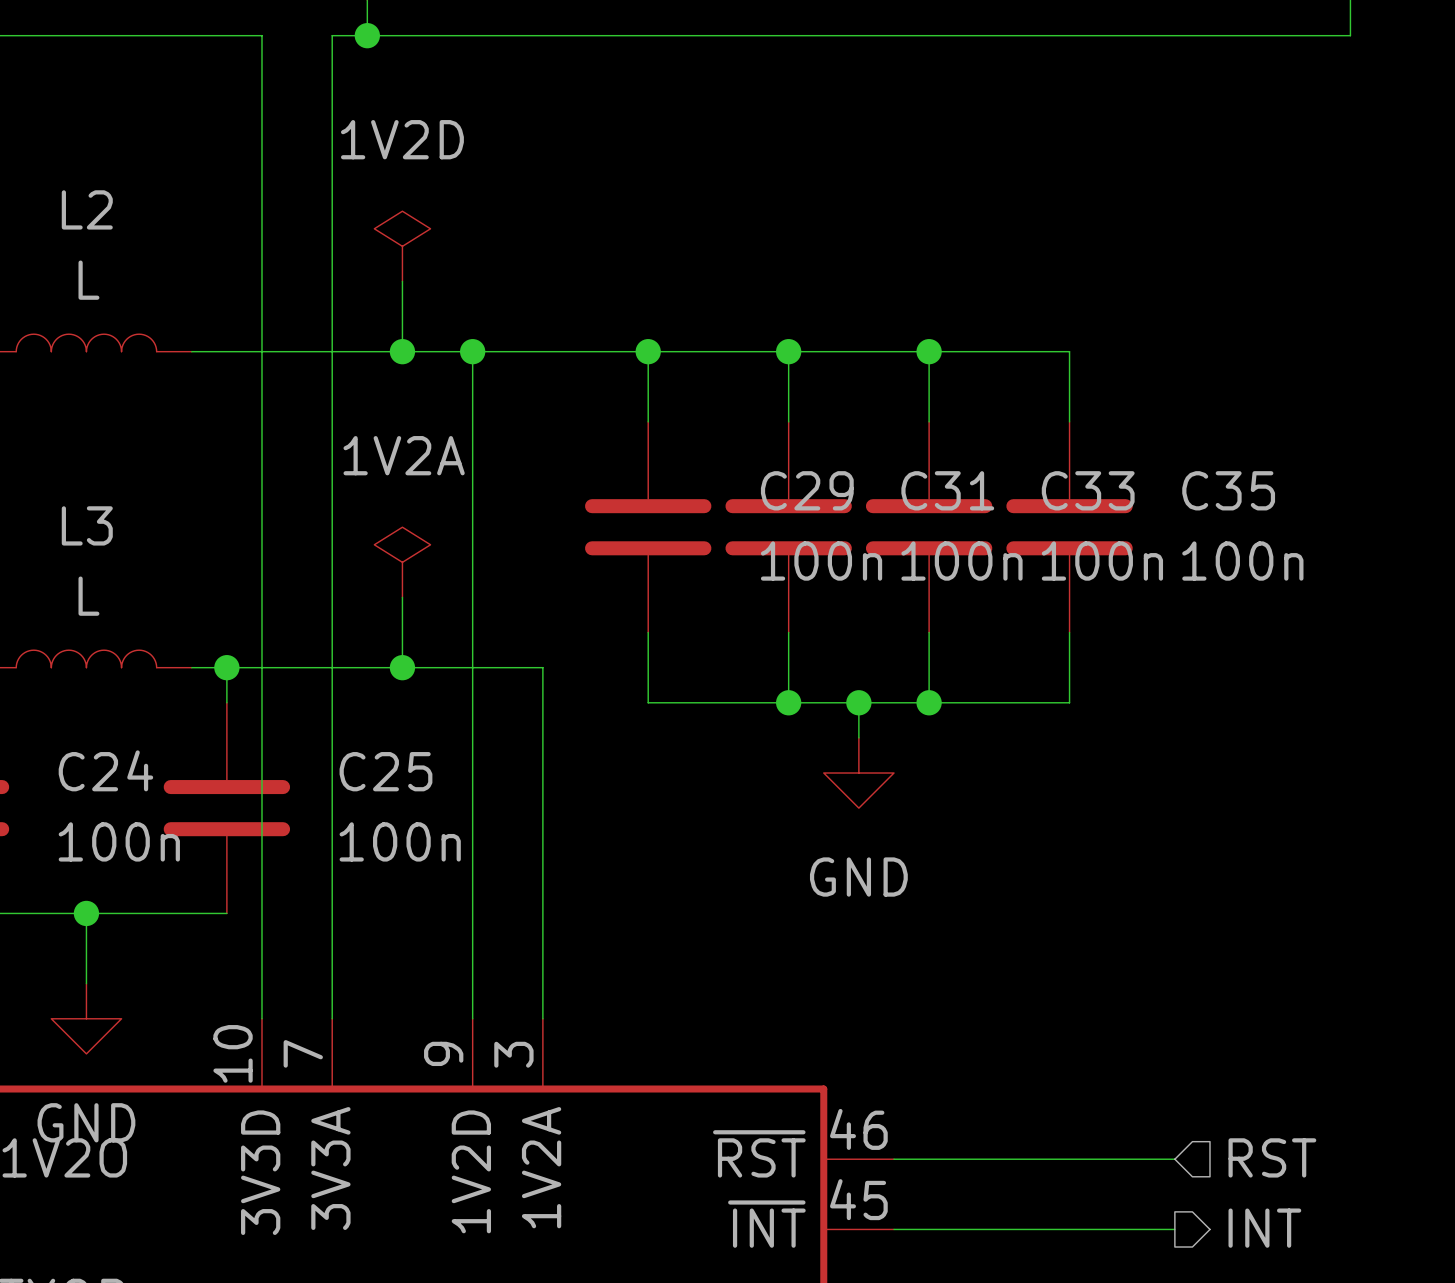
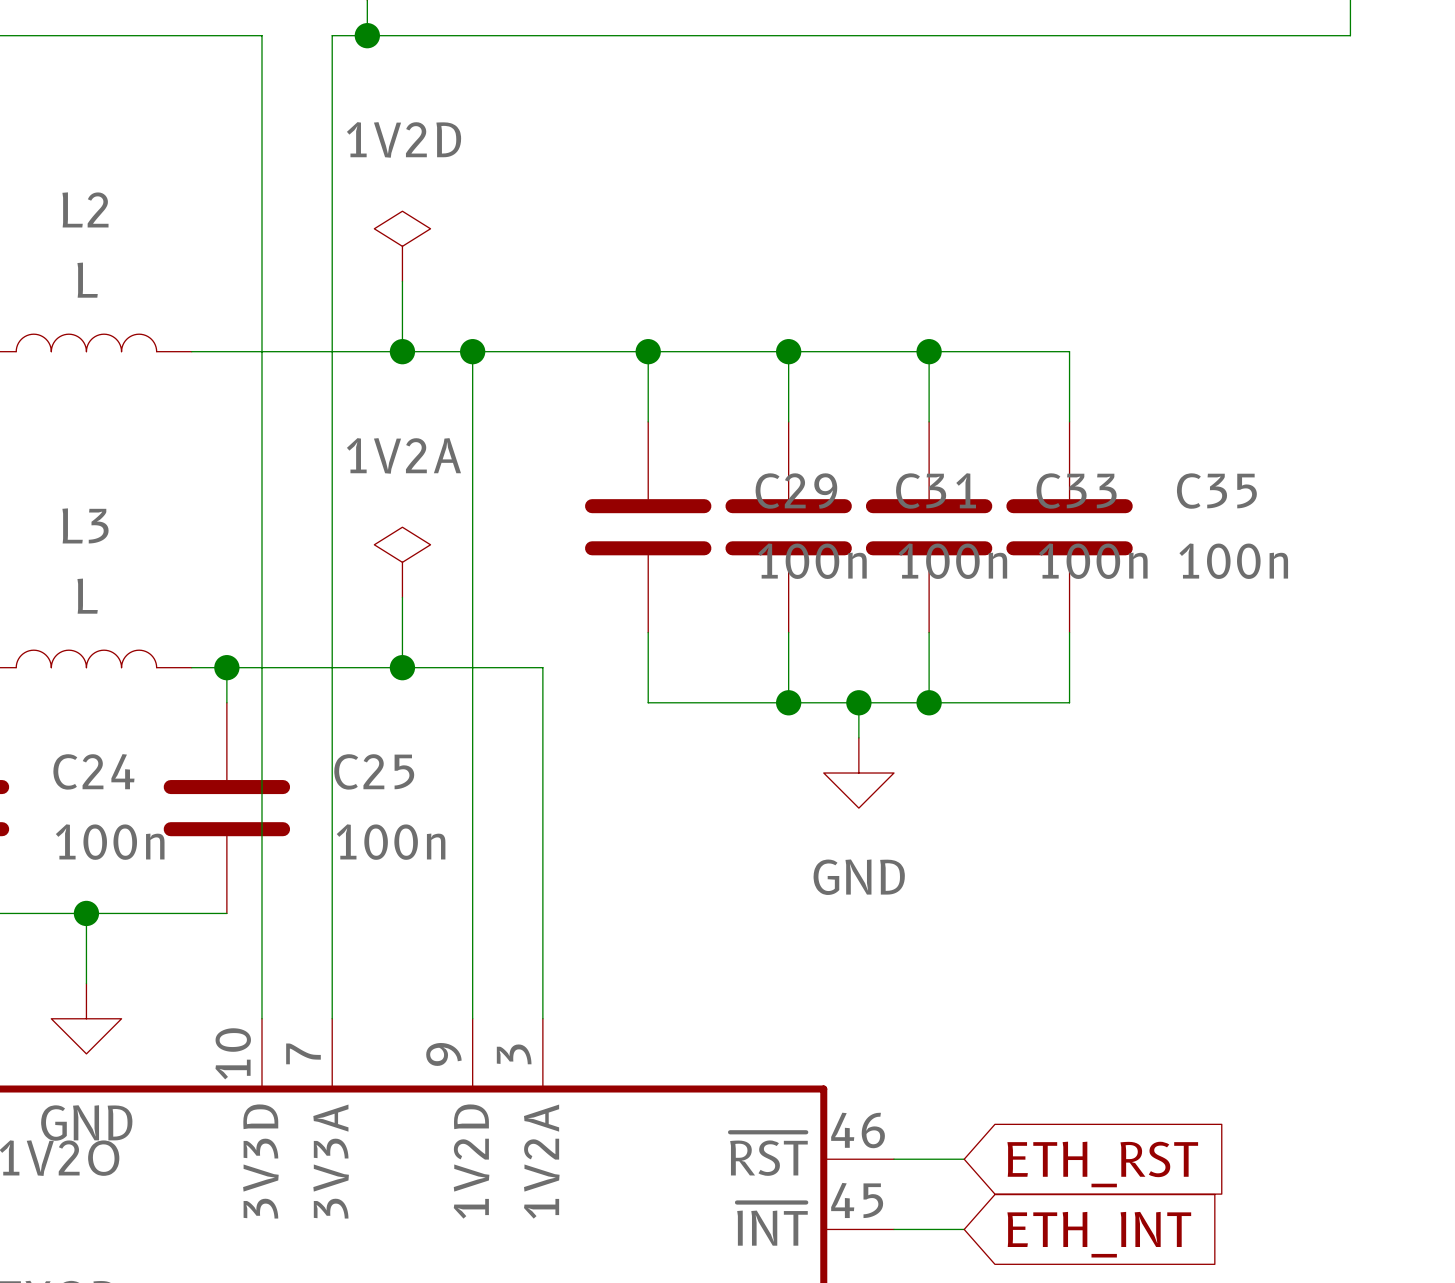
hierarchical label: RST (1272, 1157) -> none
wire: (964, 1159) (1174, 1159) -> none
global label: none -> ETH_RST (1102, 1164)
hierarchical label: INT (1264, 1228) -> none
wire: (964, 1229) (1174, 1229) -> none
global label: none -> ETH_INT (1099, 1234)

